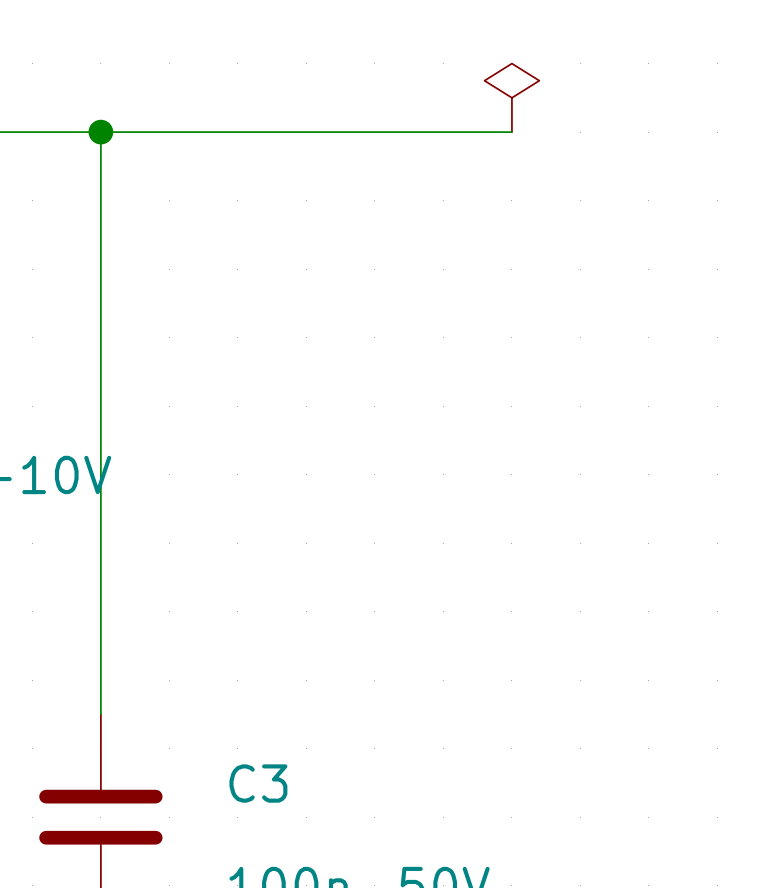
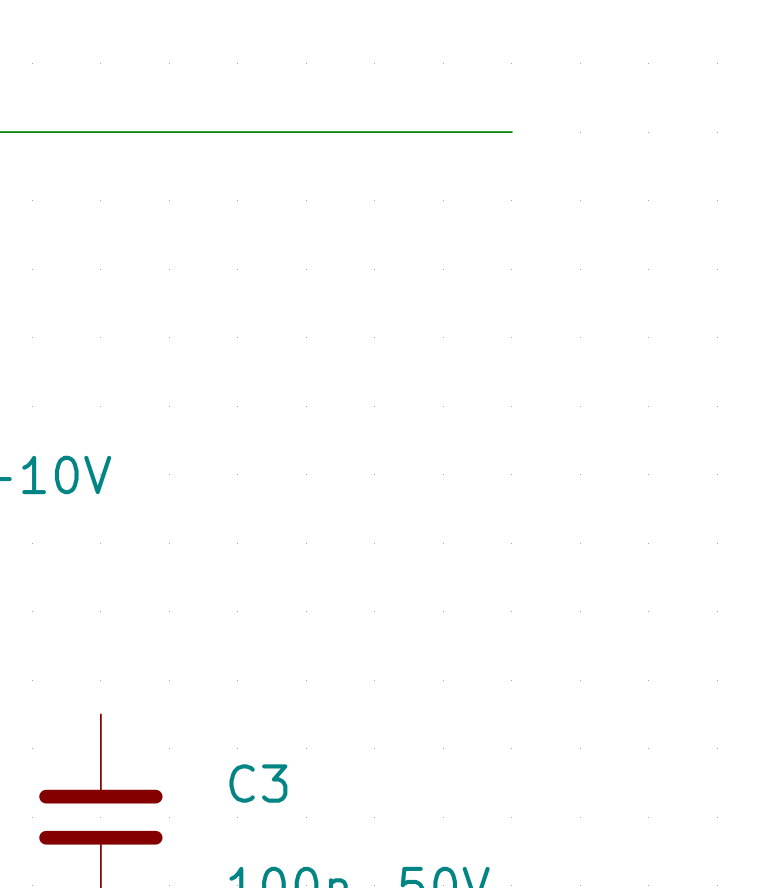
power symbol: (511, 97) -> none
wire: (100, 132) (100, 714) -> none
junction: (100, 132) -> none

